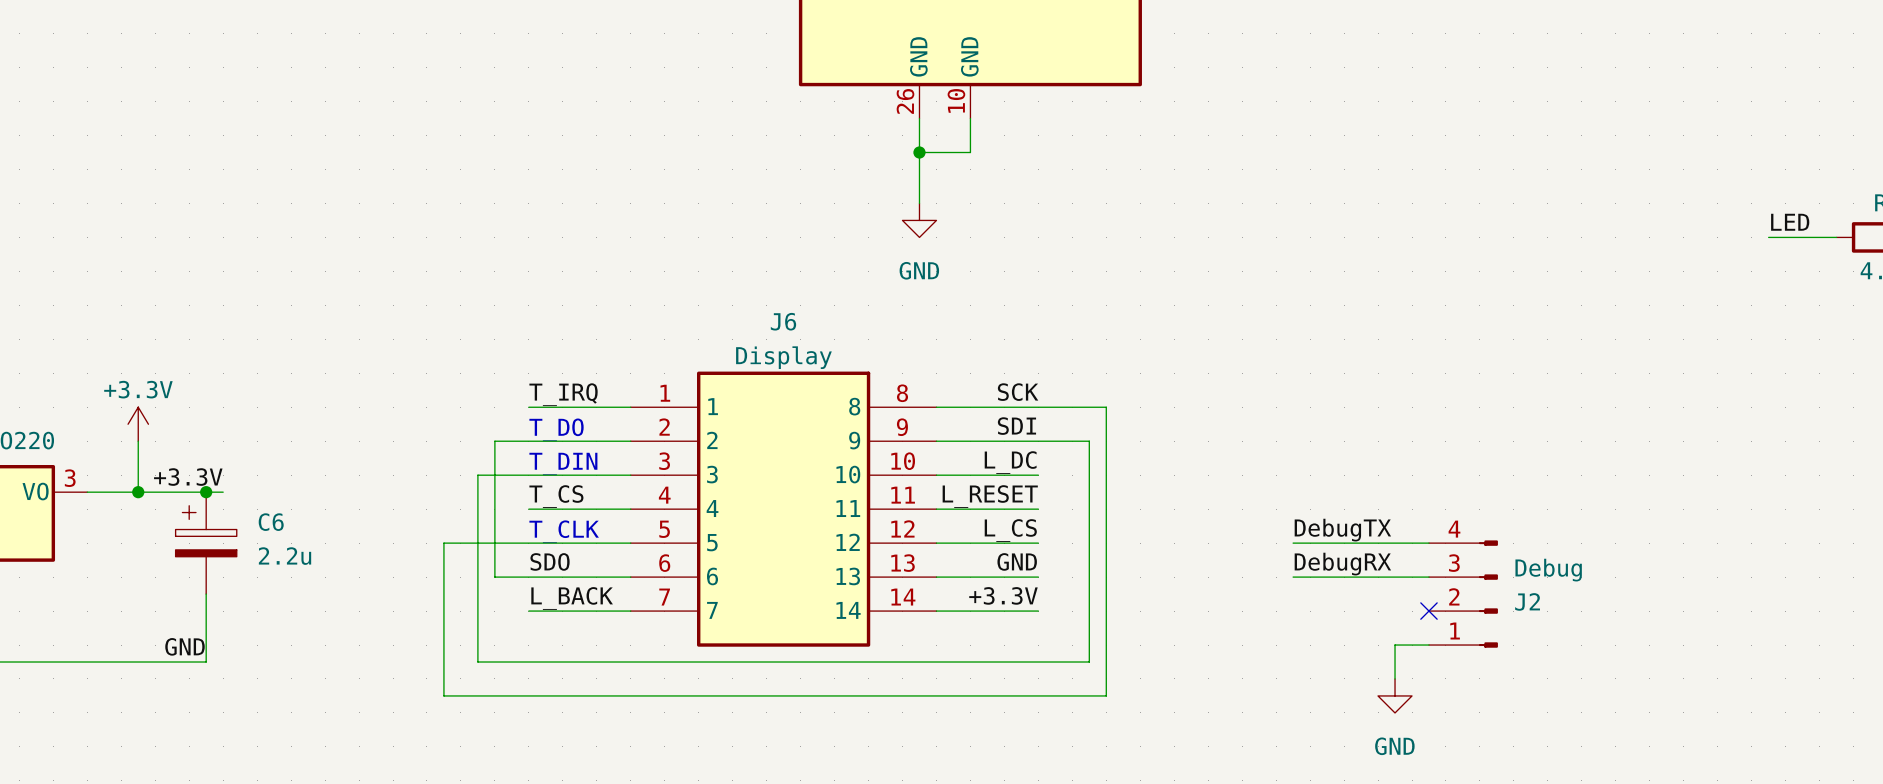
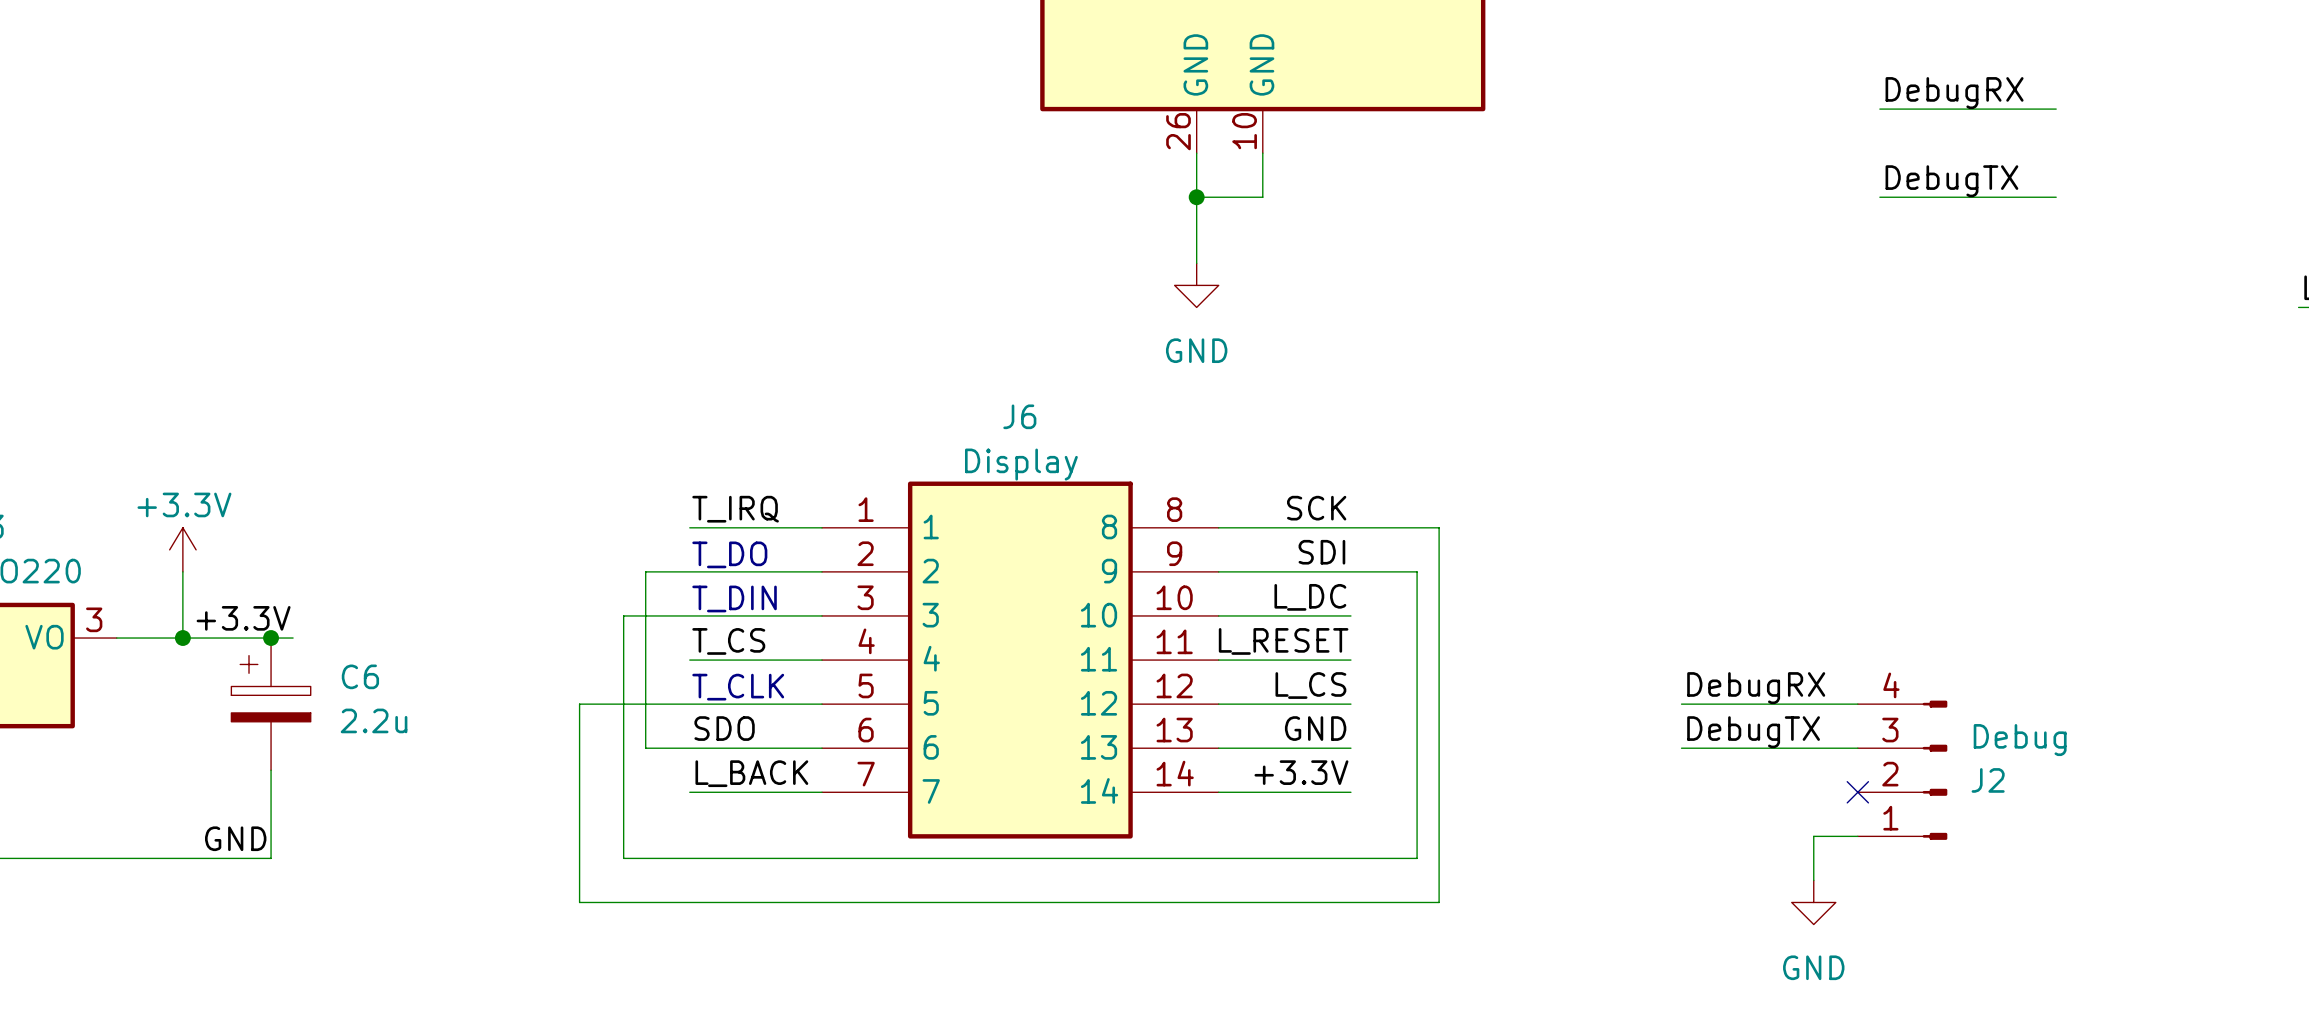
label: none -> DebugRX (1954, 93)
wire: none -> (1879, 109) (2056, 109)
label: none -> DebugTX (1951, 181)
wire: none -> (1879, 197) (2056, 197)
label: DebugTX (1342, 530) -> DebugRX (1756, 688)
label: DebugRX (1342, 564) -> DebugTX (1753, 732)

